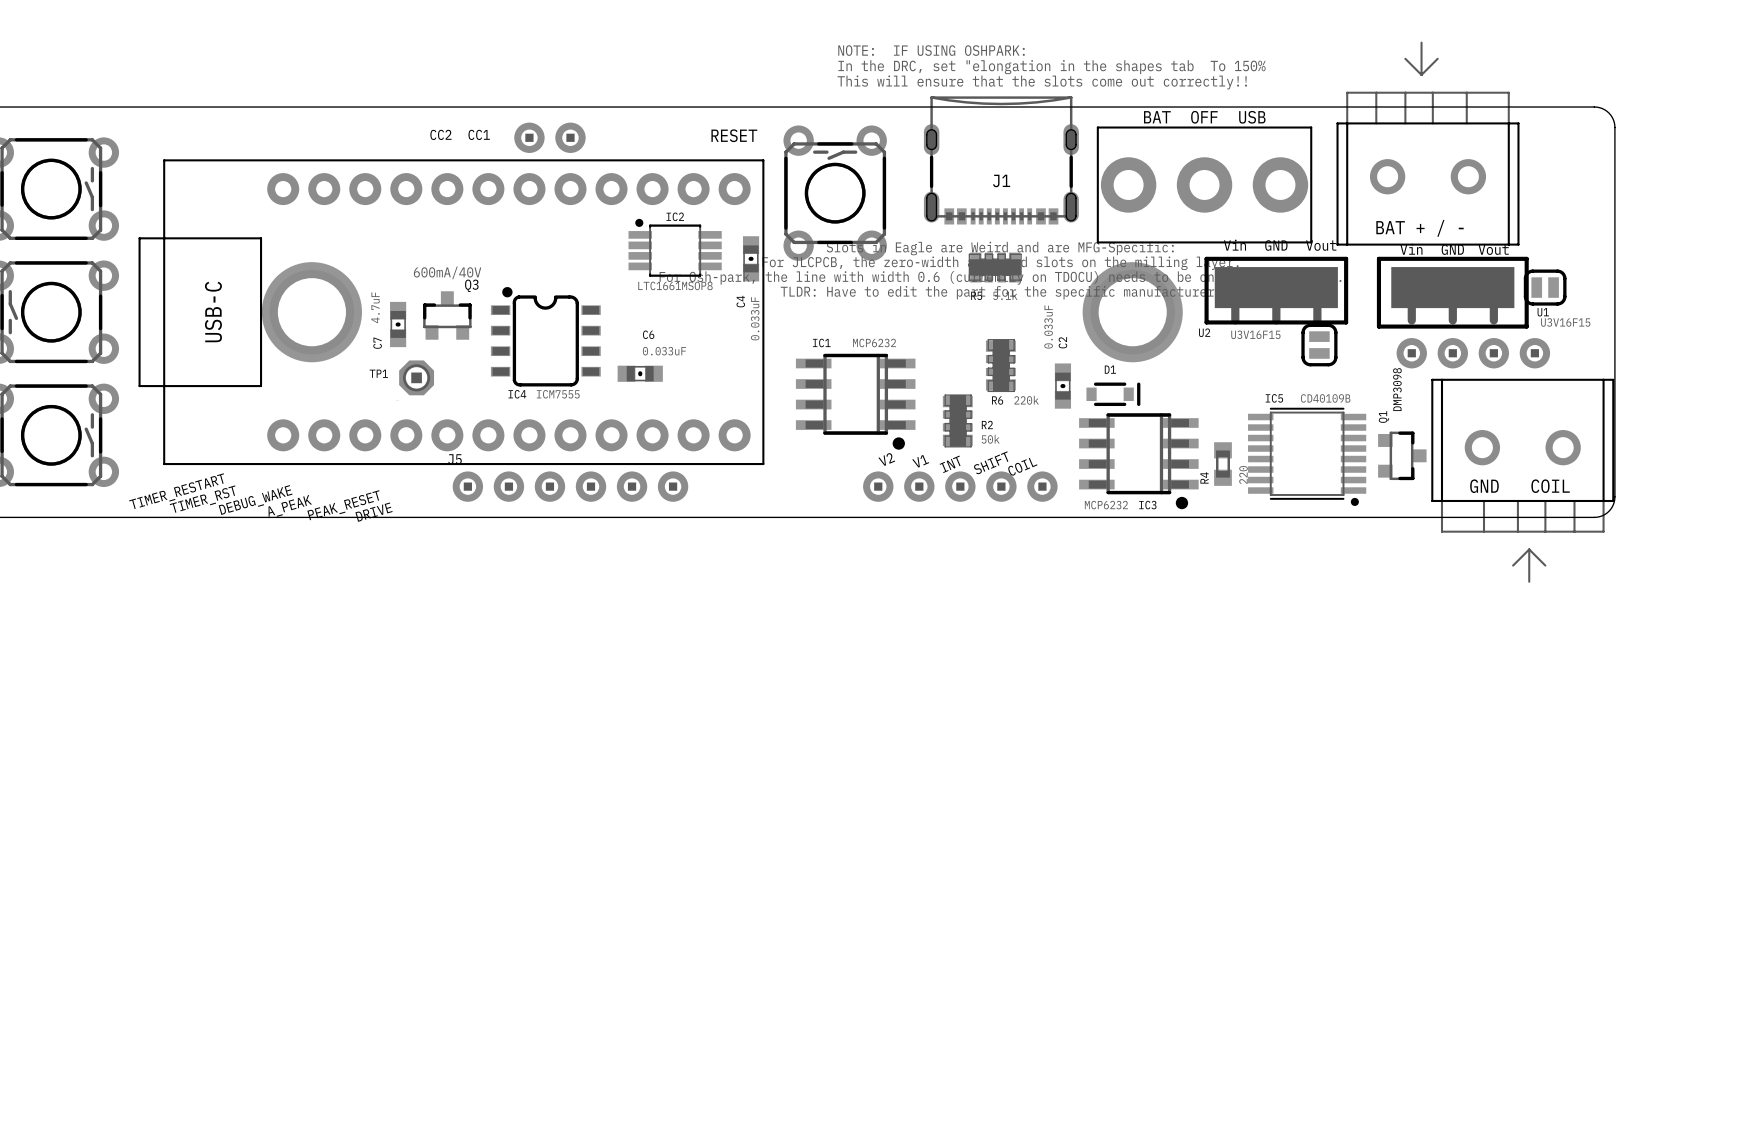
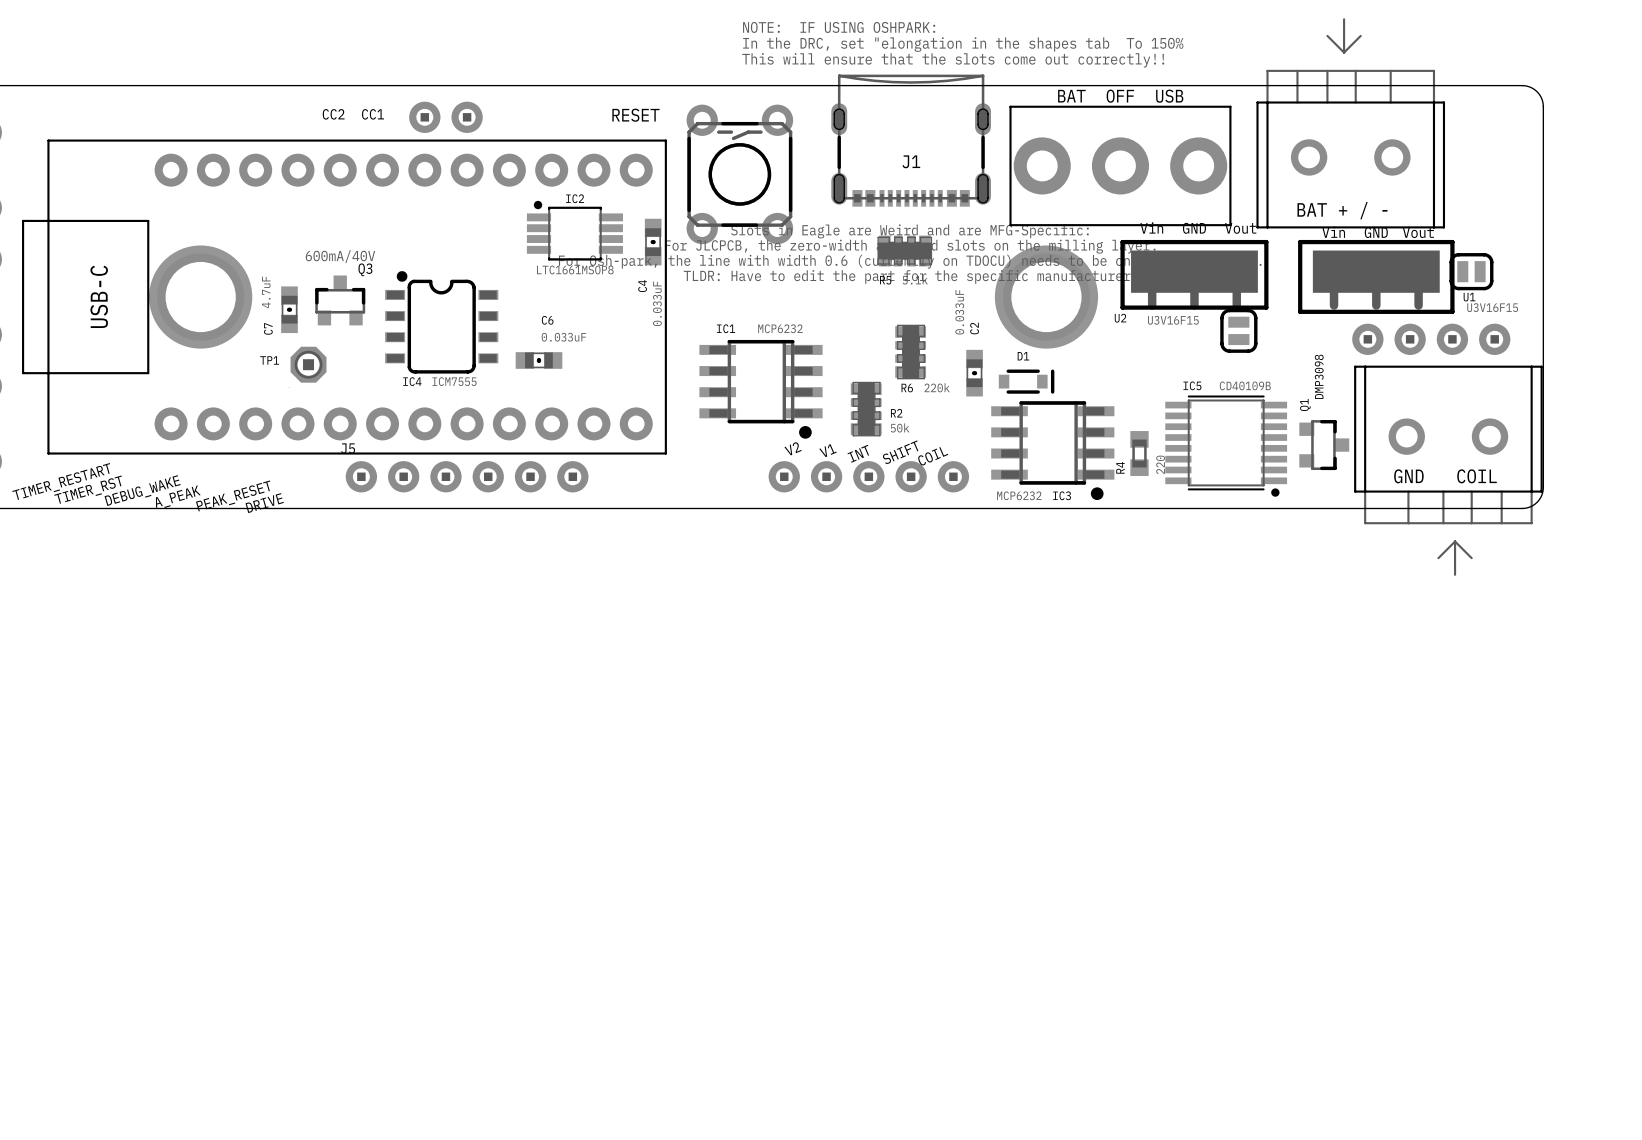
part position: (1473, 353) -> (1431, 339)

